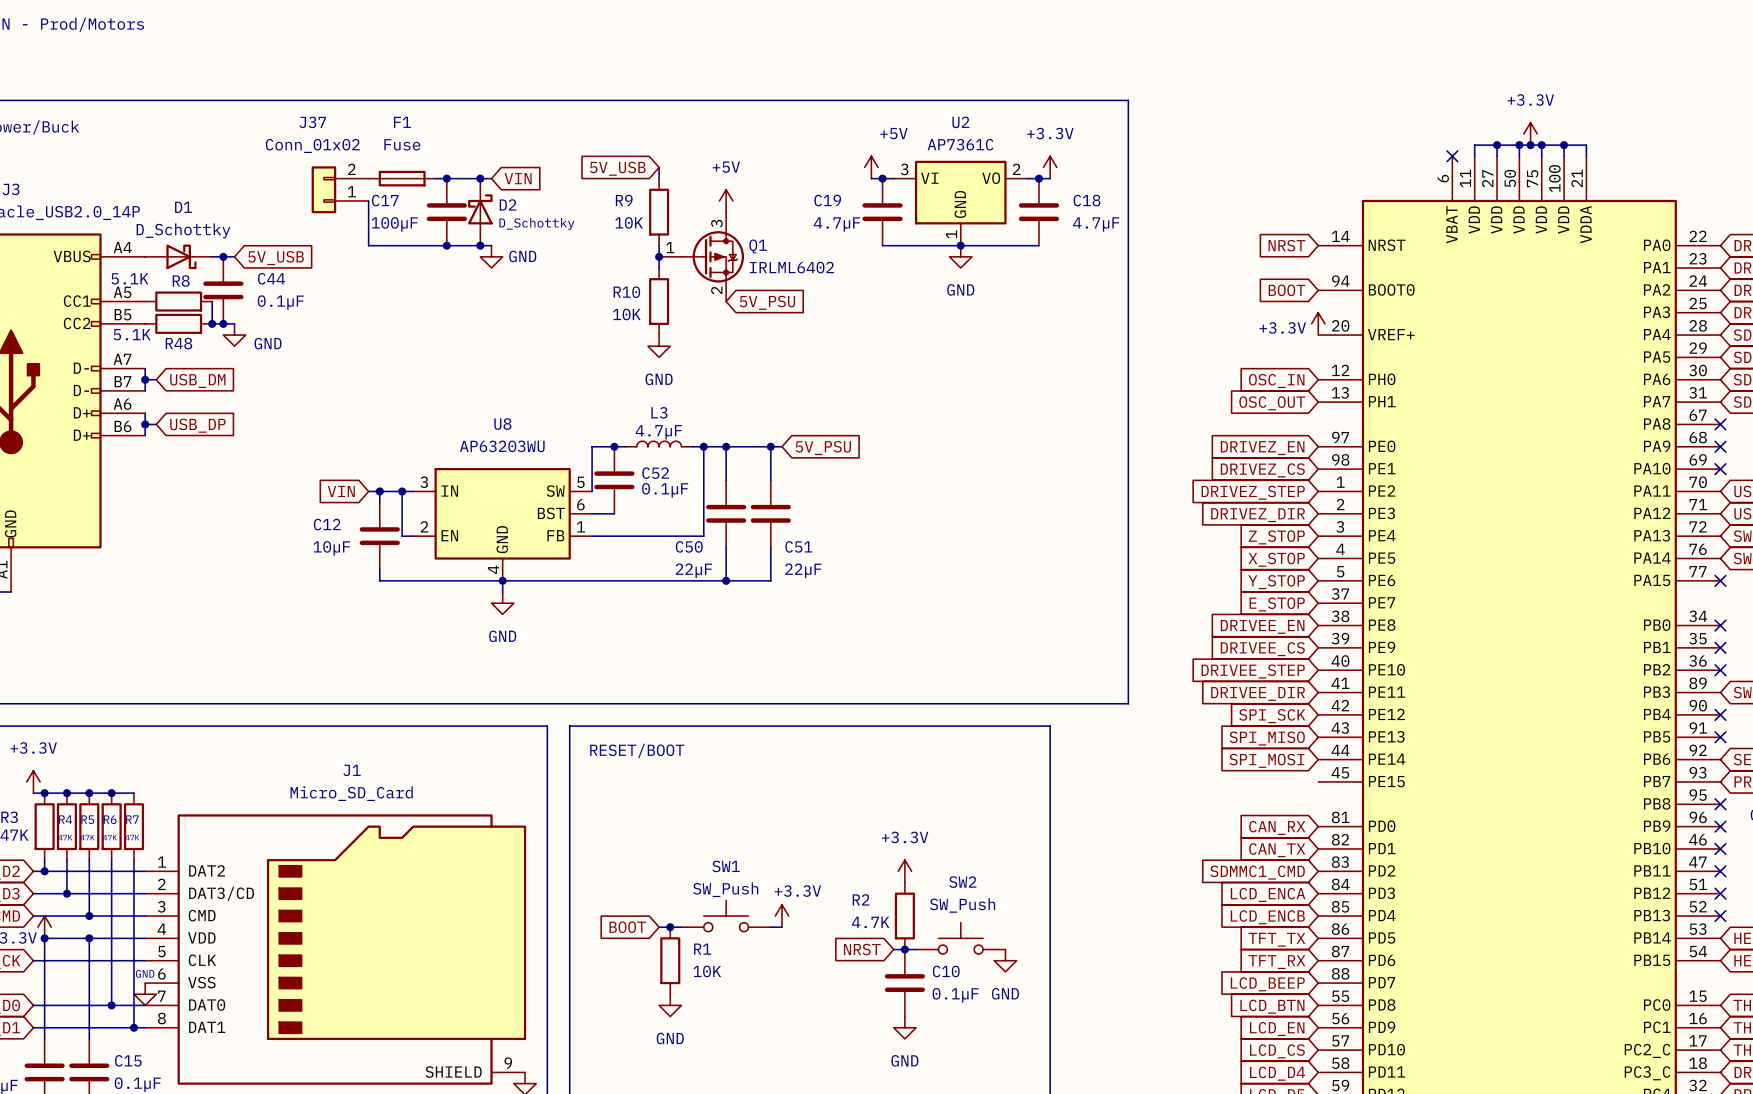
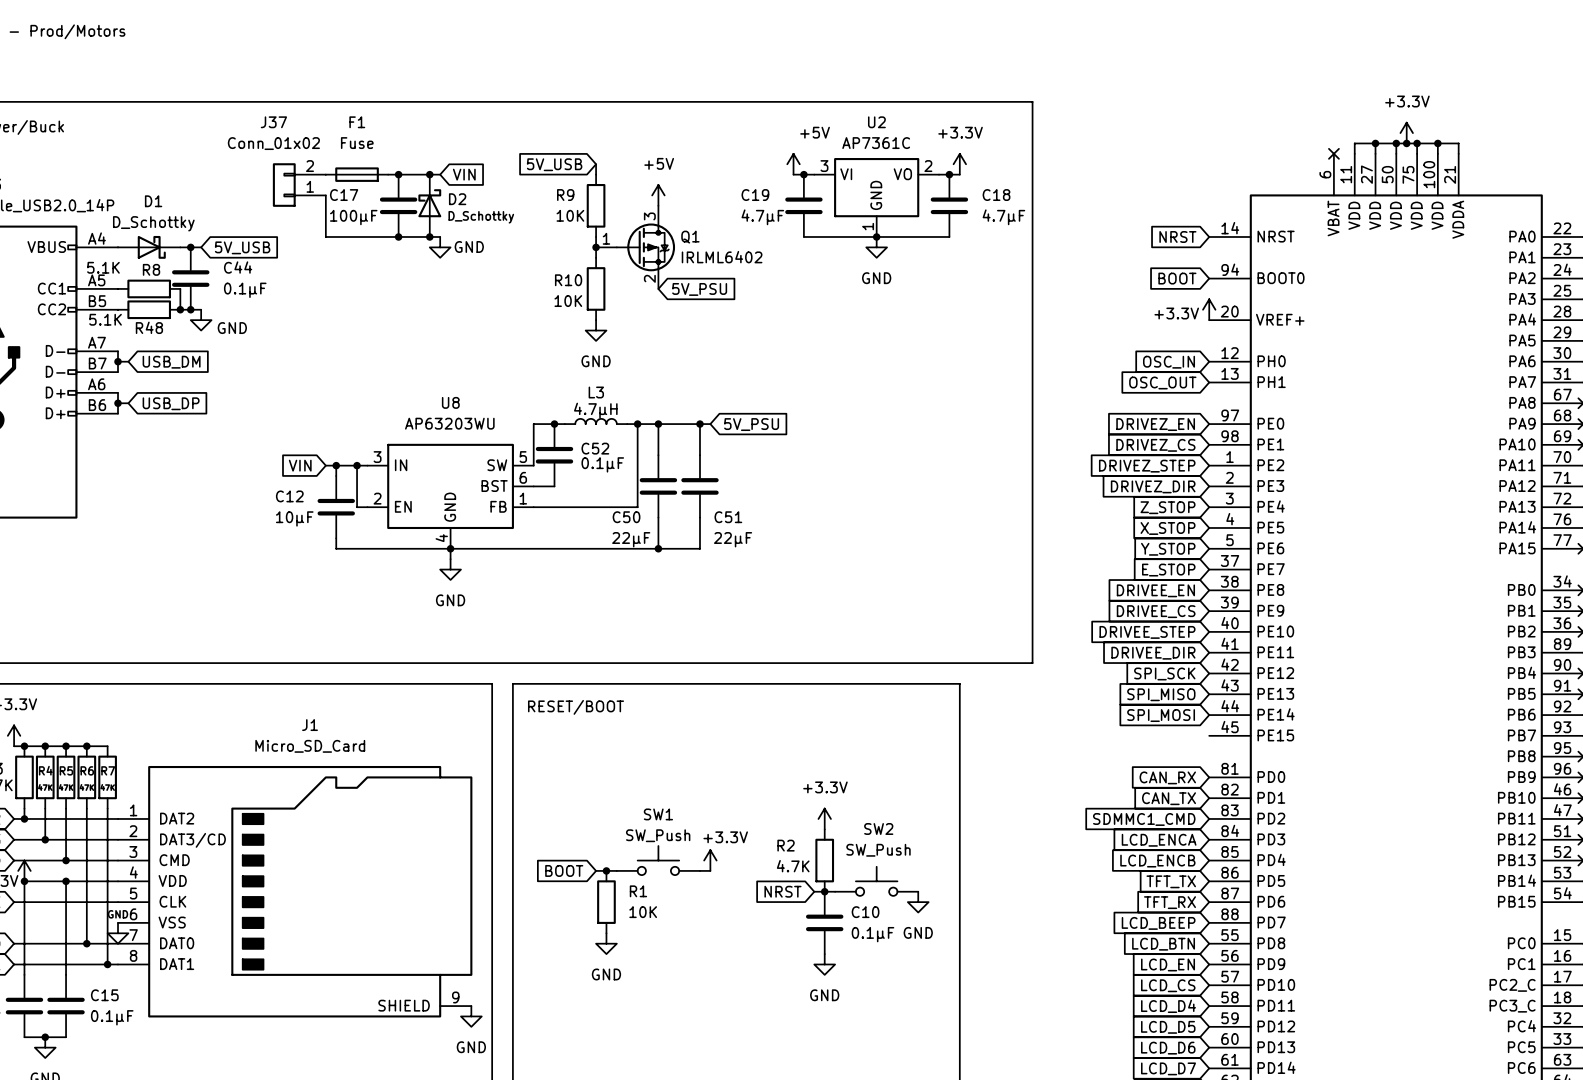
L3 value: 4.7µF (658, 432) -> 4.7µH (595, 410)

